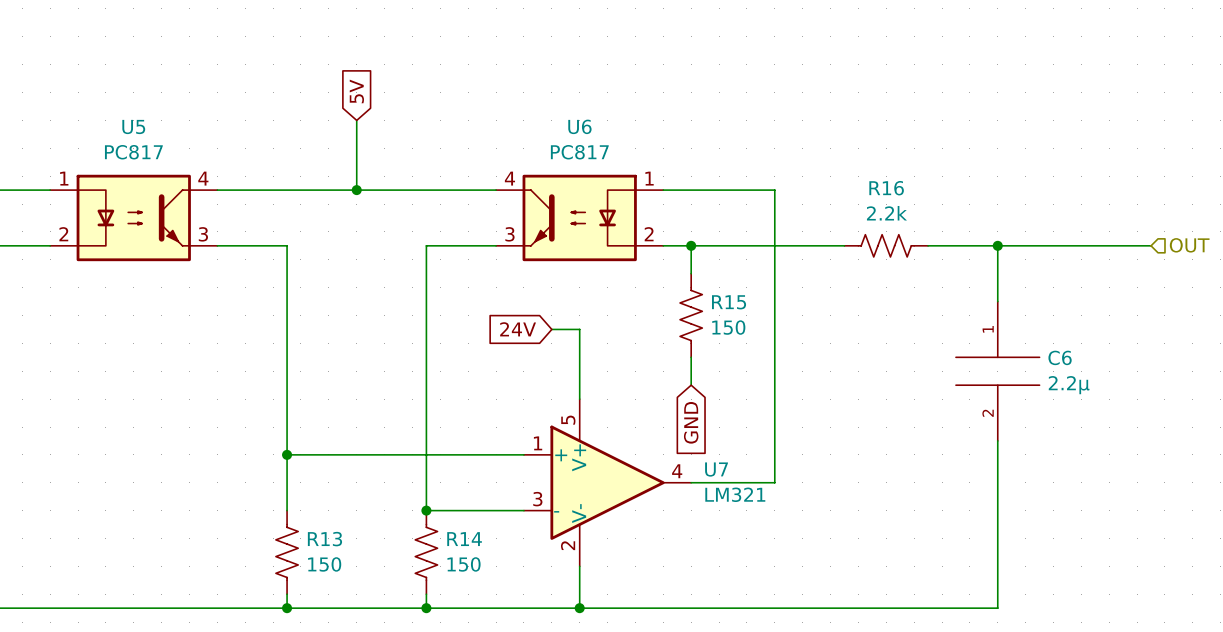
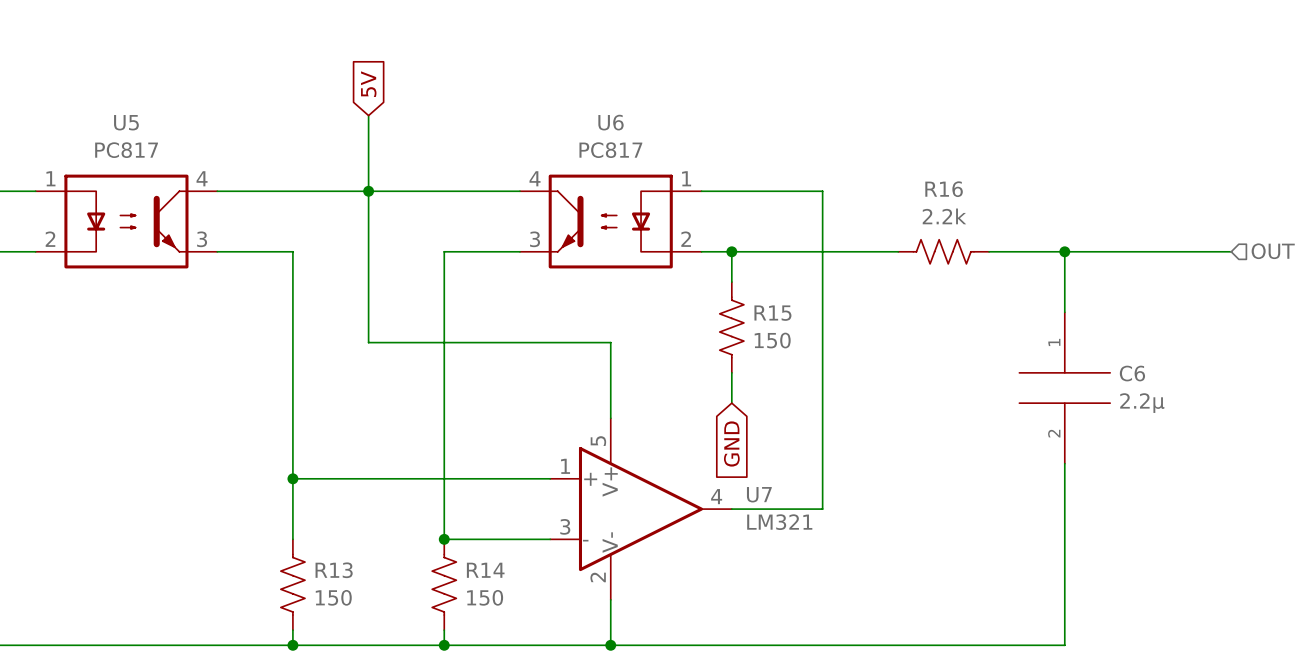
wire: none -> (368, 191) (368, 342) (580, 342)
global label: 24V (518, 329) -> none

